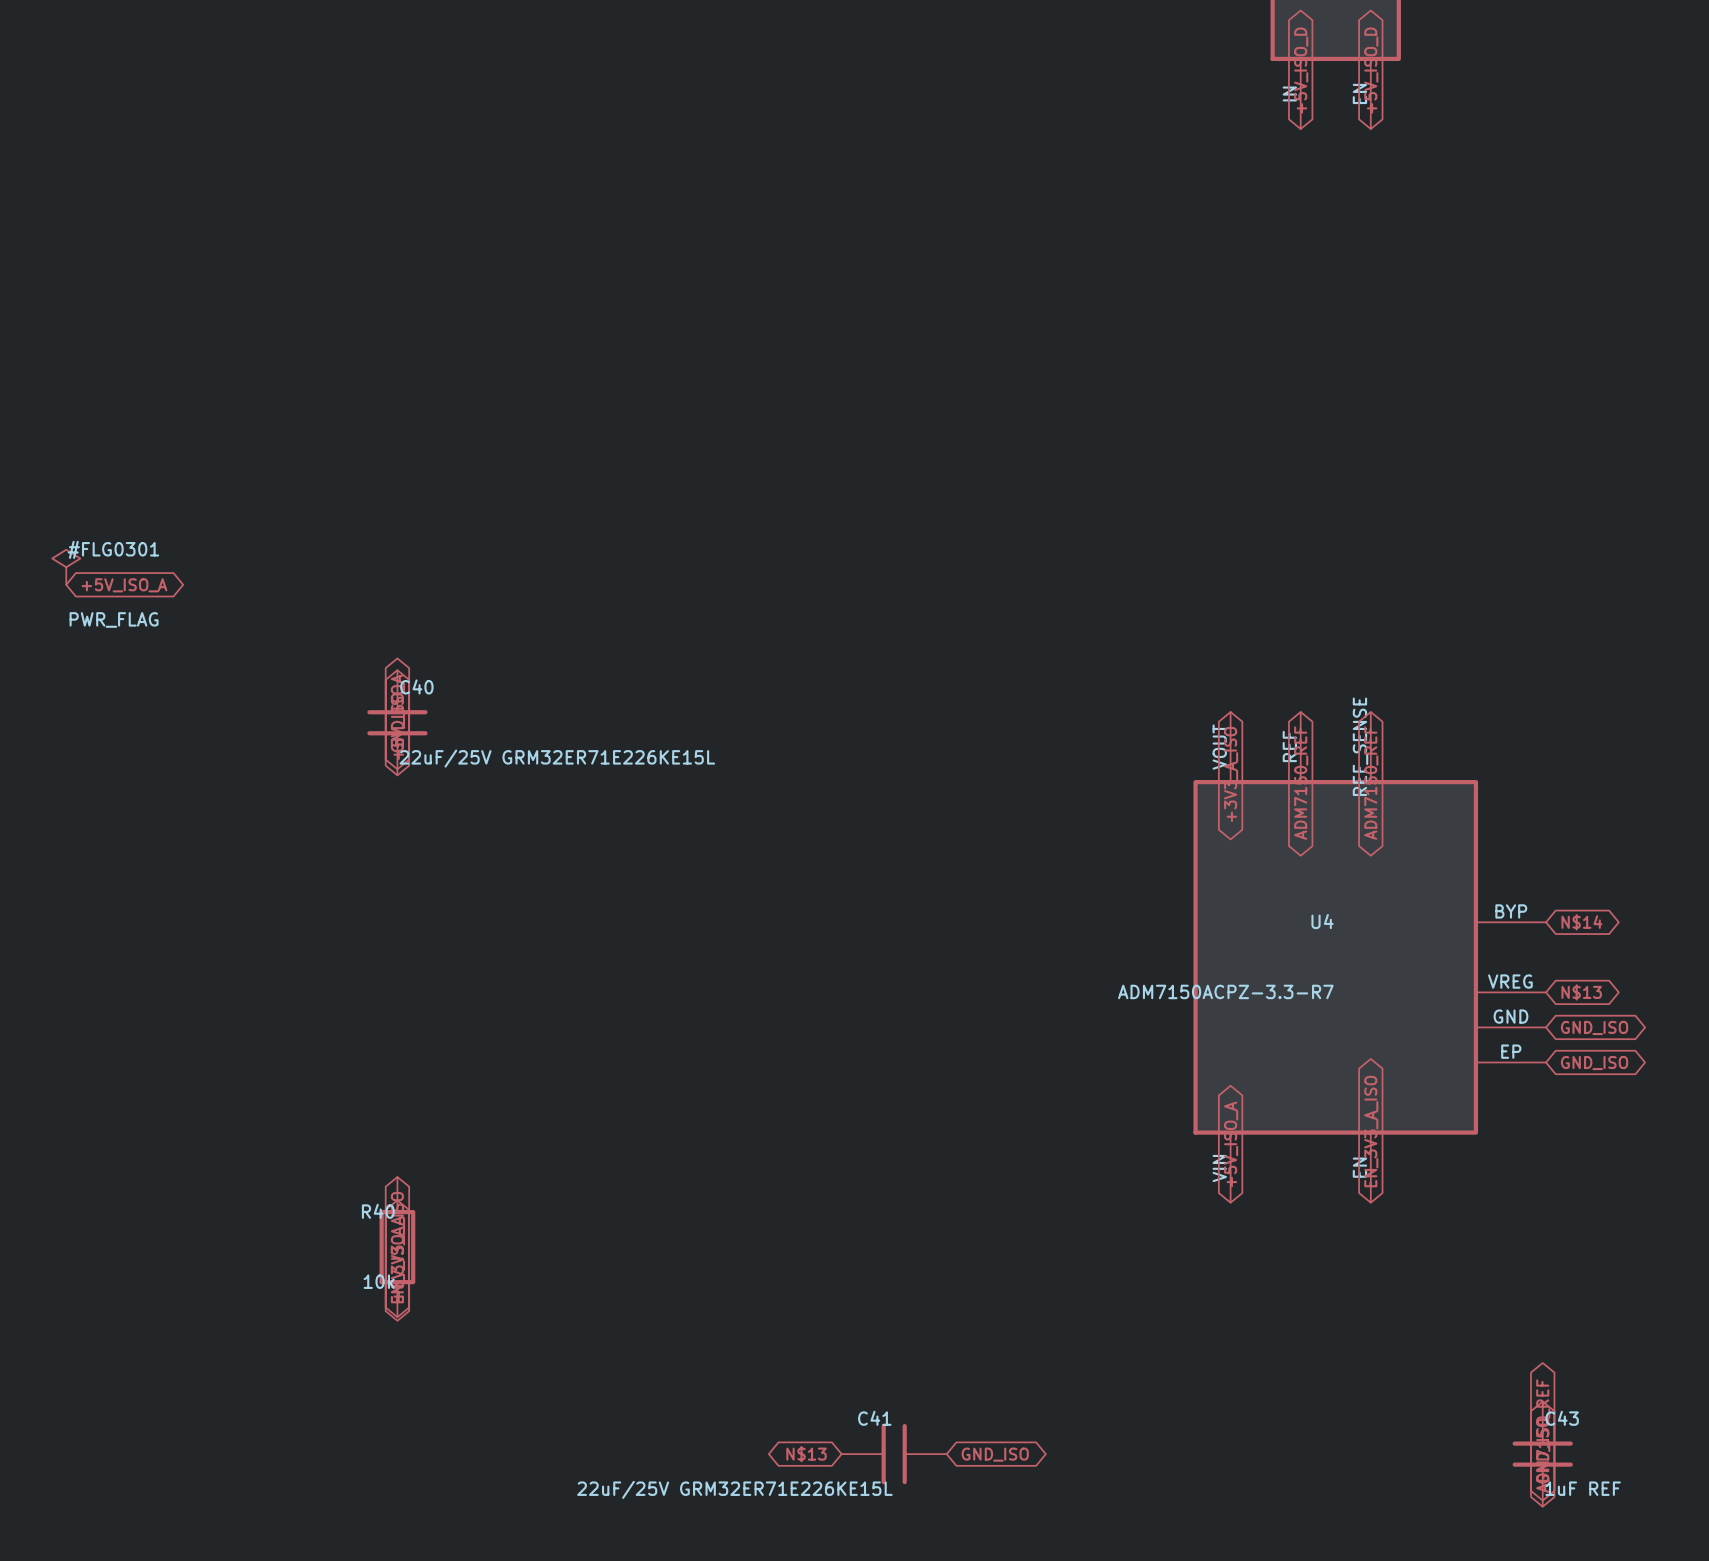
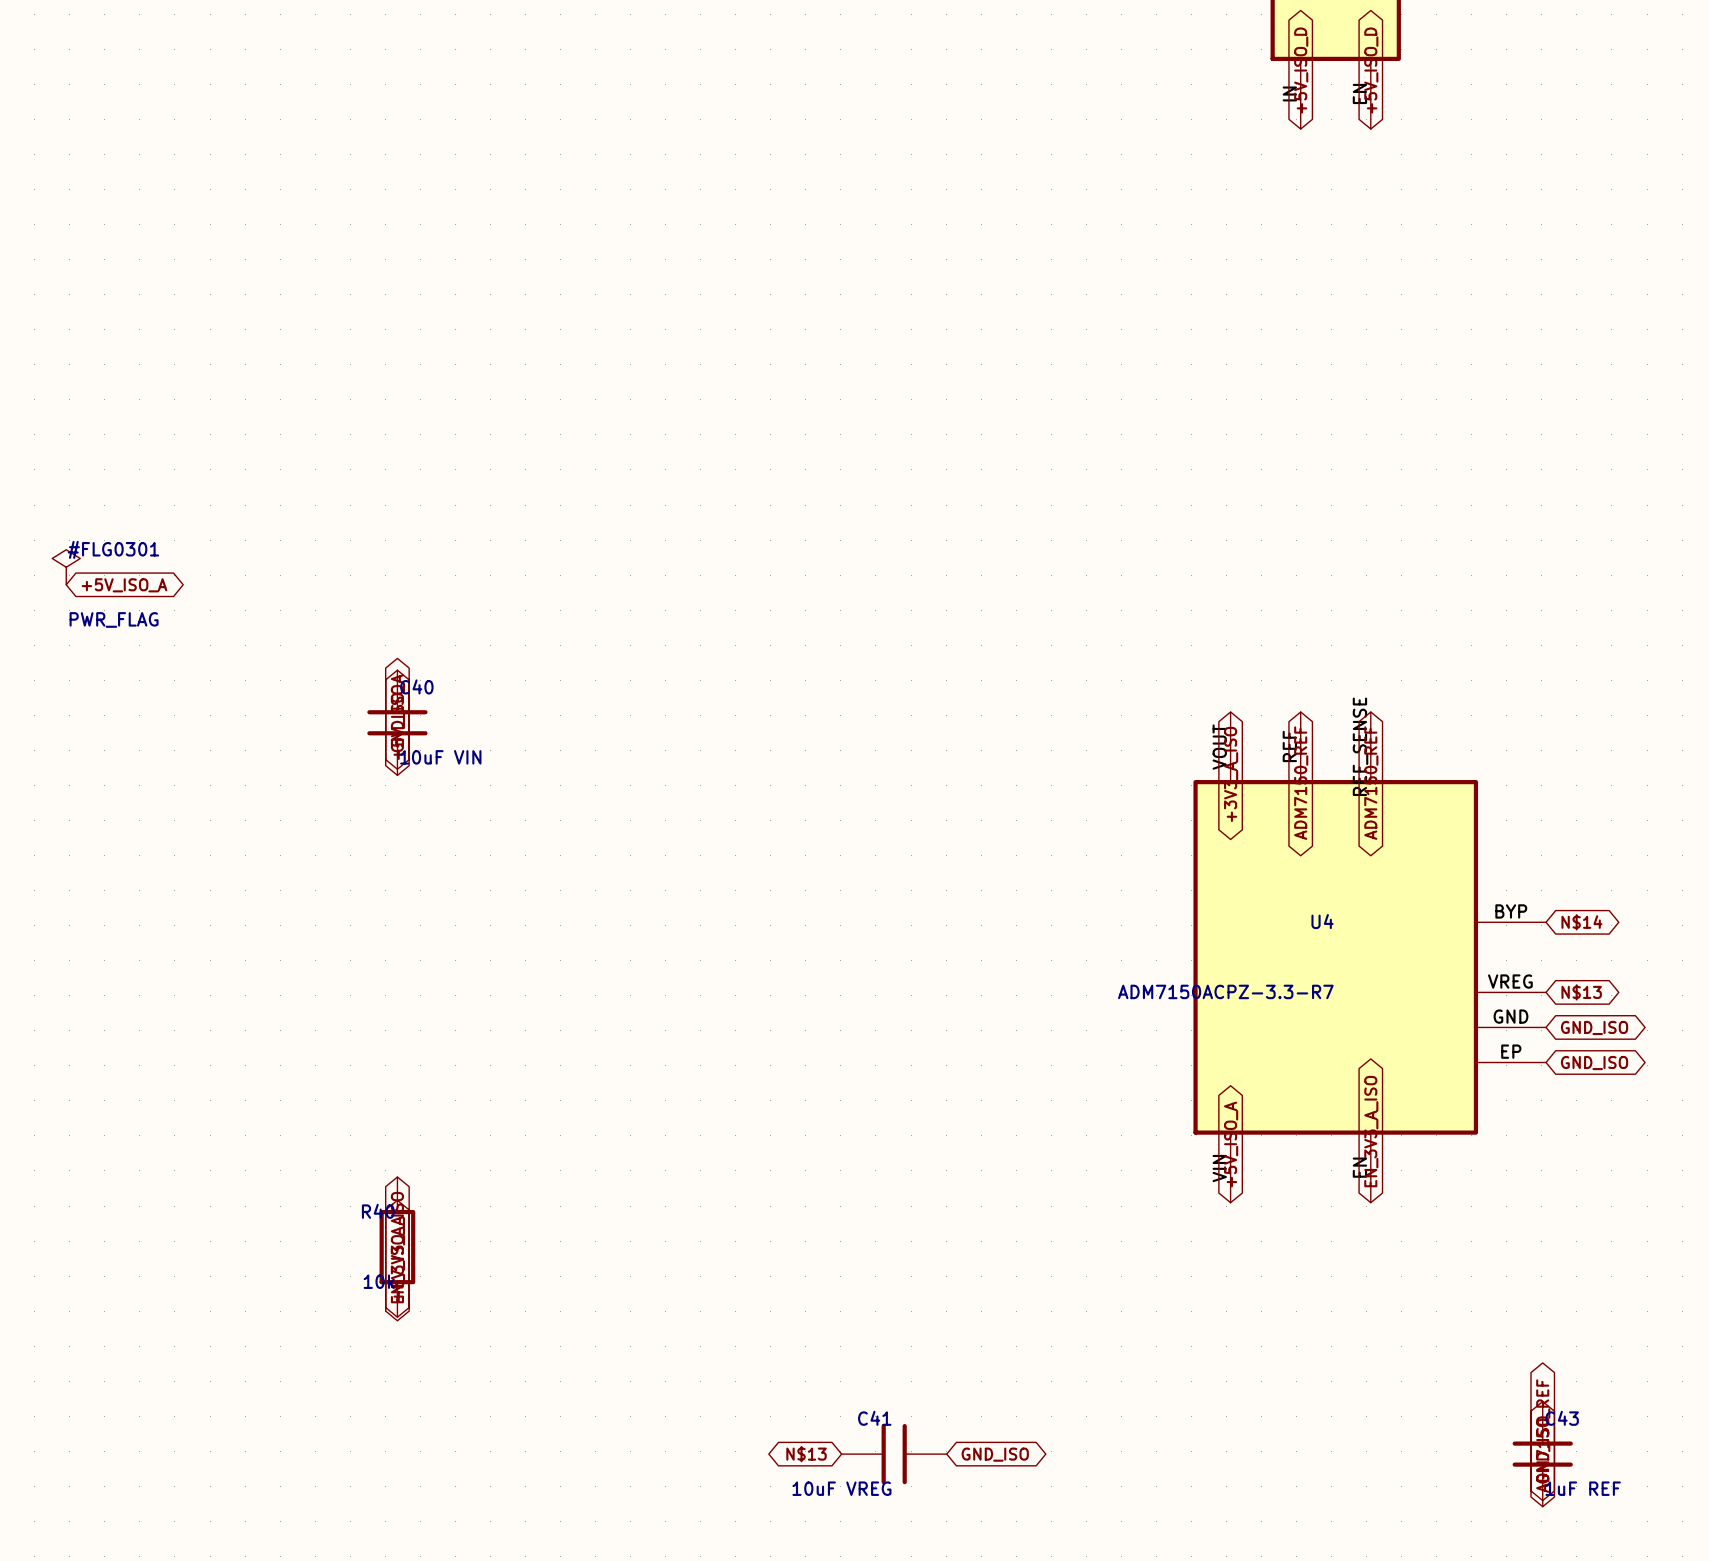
C40 value: 22uF/25V GRM32ER71E226KE15L (557, 758) -> 10uF VIN (440, 757)
C41 value: 22uF/25V GRM32ER71E226KE15L (734, 1489) -> 10uF VREG (841, 1488)

